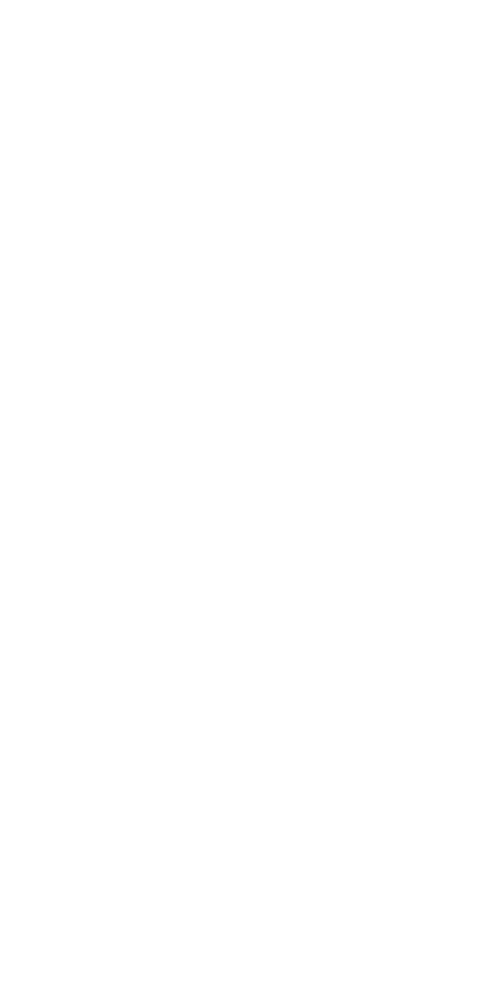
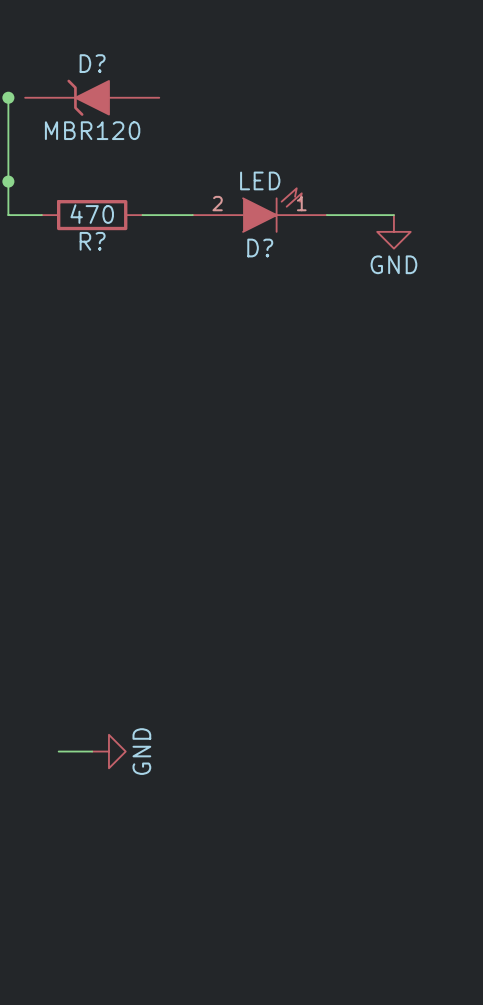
wire: none -> (8, 97) (8, 215) (41, 215)
junction: none -> (8, 97)
D?: none -> MBR120 (92, 97)
junction: none -> (8, 181)
D?: none -> LED (259, 210)
R?: none -> 470 (92, 215)
wire: none -> (142, 215) (192, 215)
wire: none -> (326, 215) (393, 215)
power symbol: none -> GND (393, 231)
wire: none -> (58, 751) (92, 751)
power symbol: none -> GND (108, 751)

